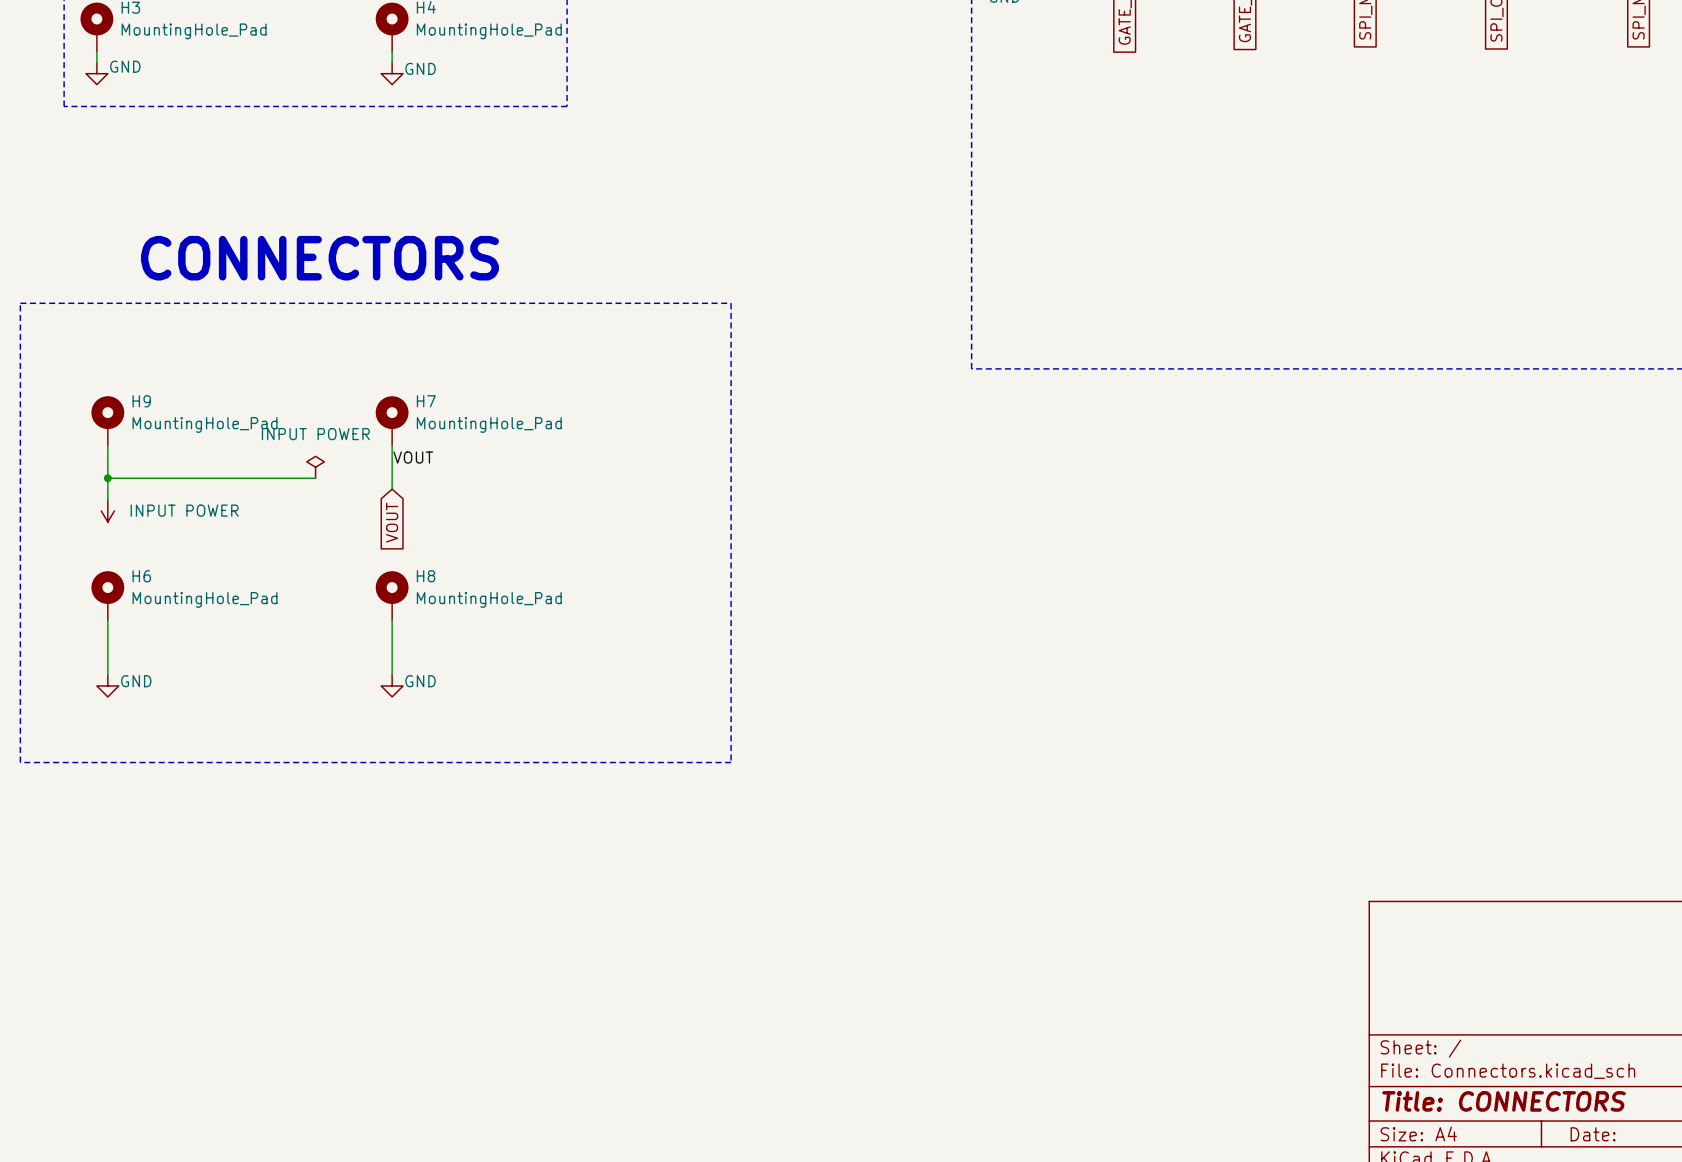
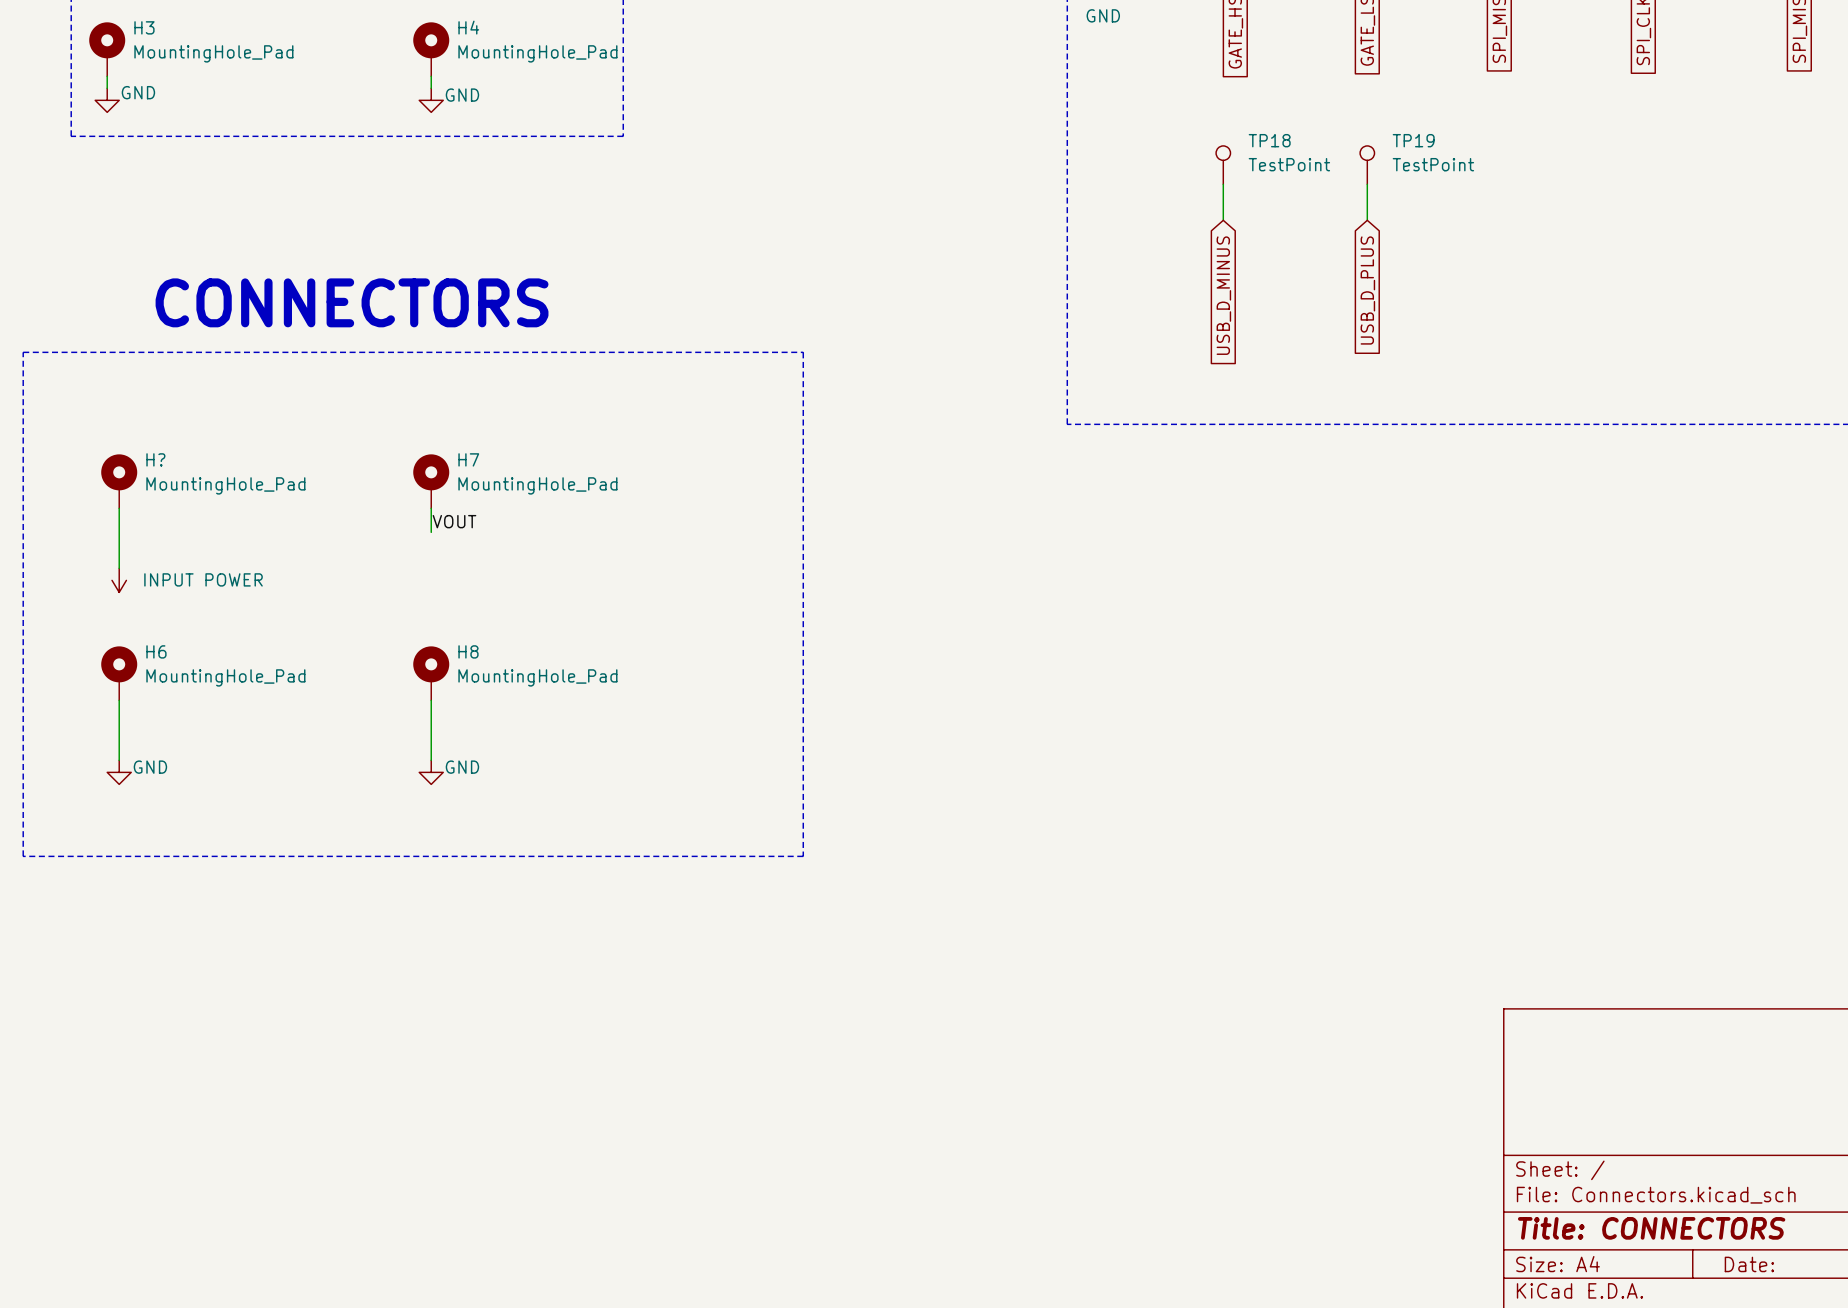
TP18: none -> TestPoint (1223, 165)
TP19: none -> TestPoint (1367, 165)
wire: none -> (1223, 184) (1223, 220)
wire: none -> (1367, 184) (1367, 220)
global label: none -> USB_D_PLUS (1367, 290)
global label: none -> USB_D_MINUS (1223, 295)
H9 name: H9 (141, 401) -> H? (155, 459)
power symbol: INPUT POWER (315, 467) -> none
wire: (392, 467) (392, 489) -> none
wire: (107, 478) (315, 478) -> none
junction: (107, 478) -> none
global label: VOUT (392, 522) -> none

